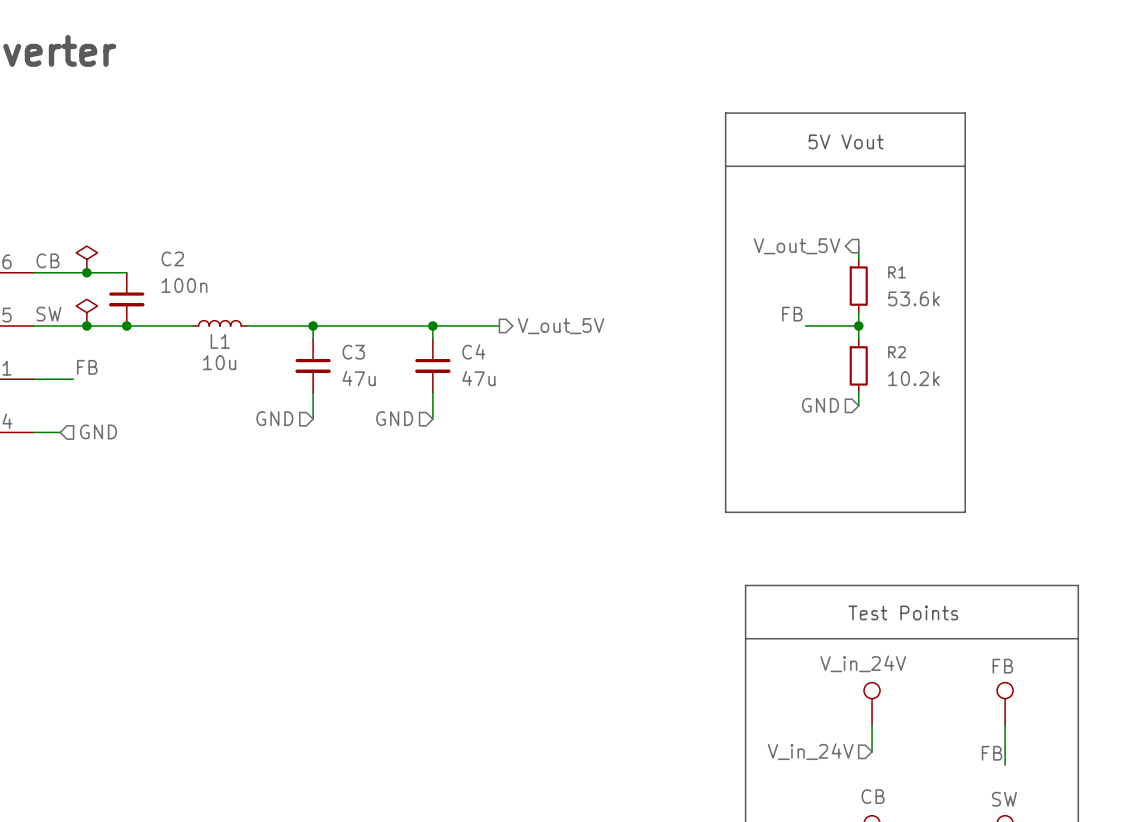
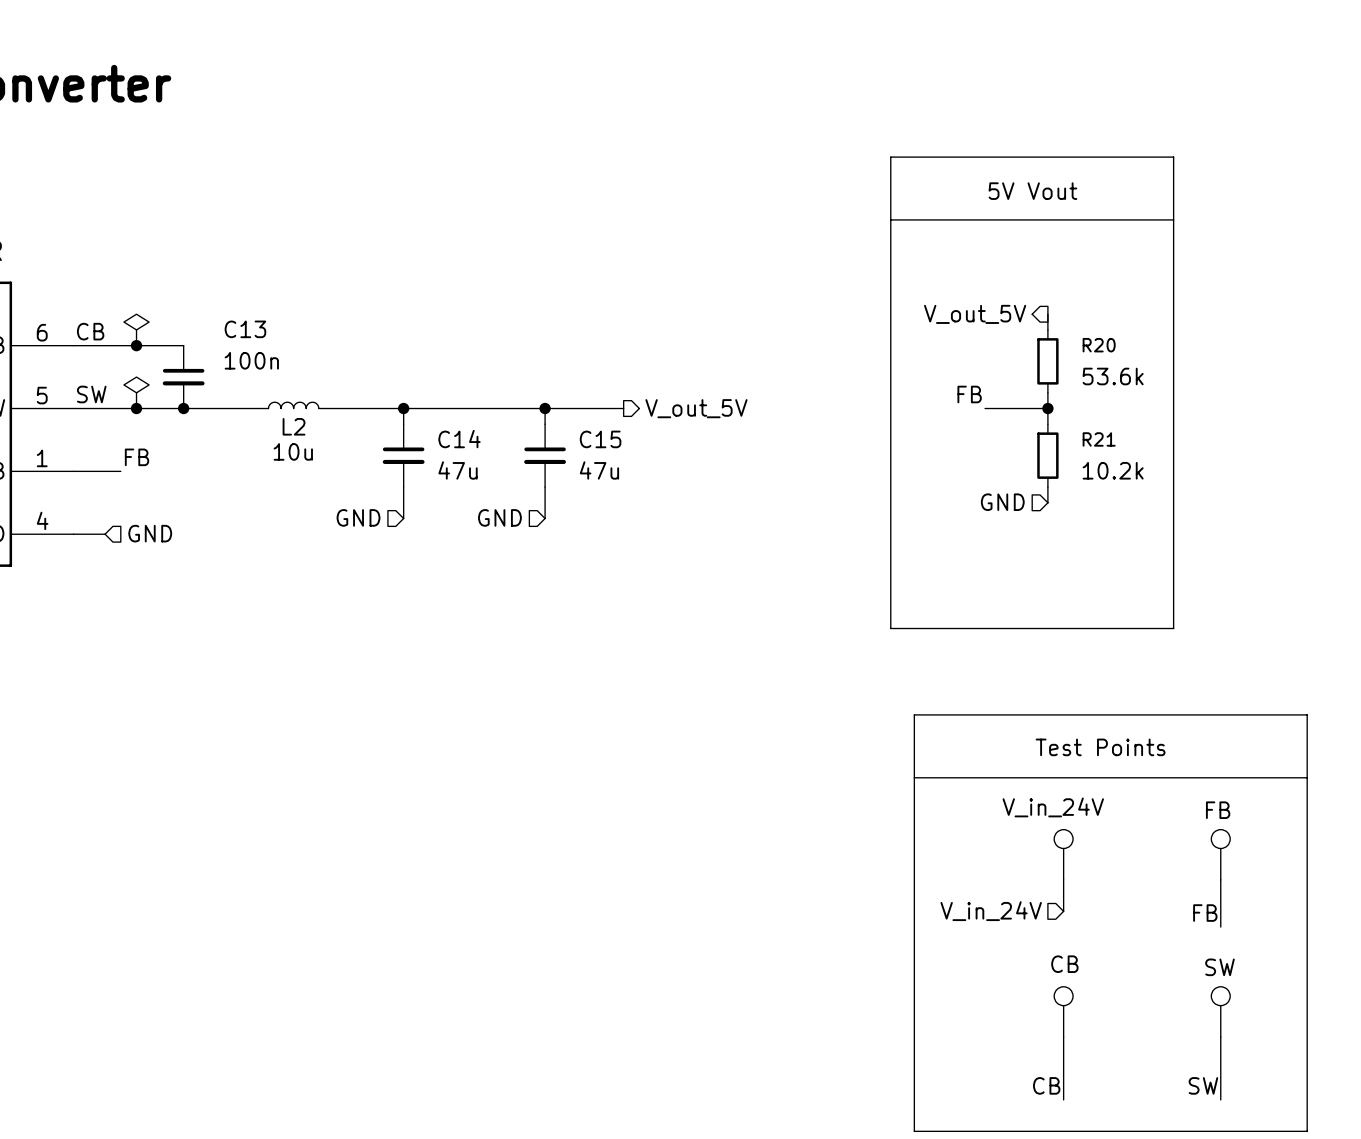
C2 name: C2 (172, 258) -> C13 (245, 329)
R1 name: R1 (897, 272) -> R20 (1099, 345)
L1 name: L1 (220, 341) -> L2 (294, 426)
C4 name: C4 (473, 351) -> C15 (600, 439)
C3 name: C3 (353, 352) -> C14 (459, 439)
R2 name: R2 (897, 352) -> R21 (1099, 439)

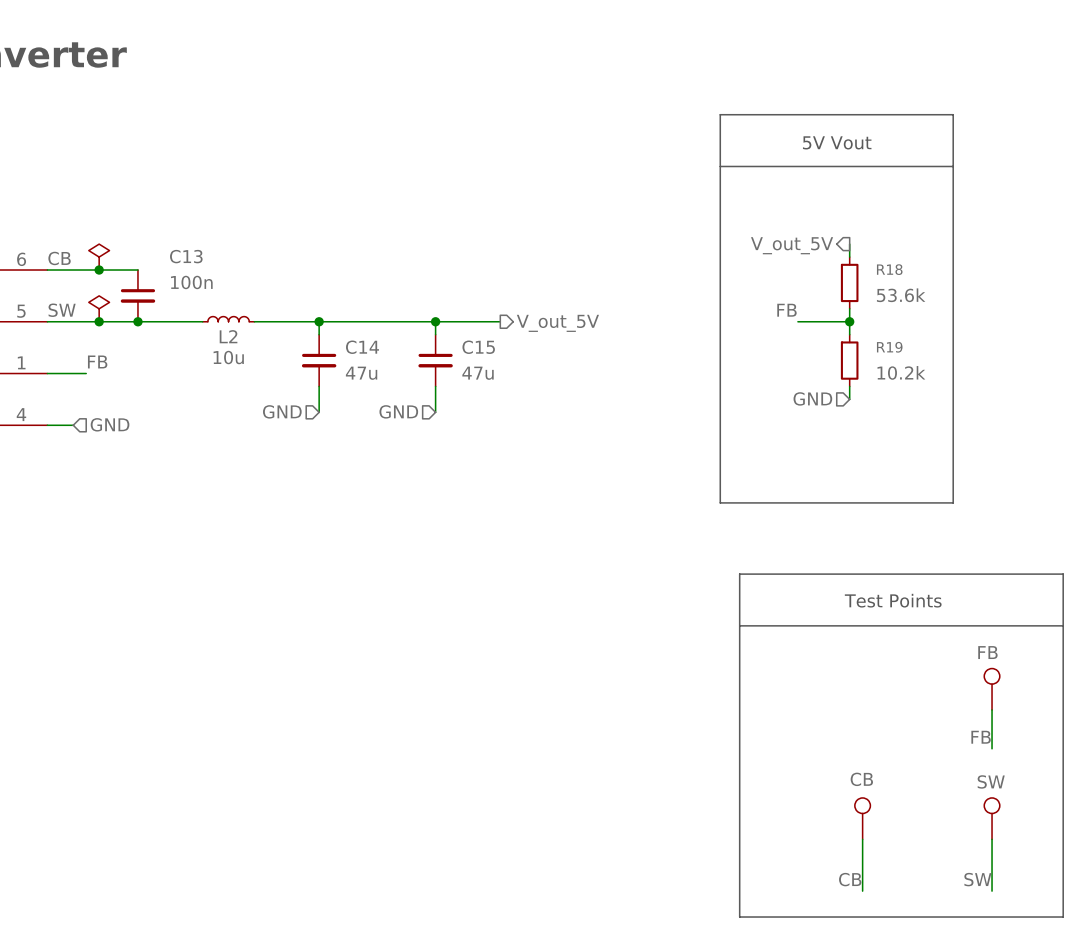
R20 name: R20 (1099, 345) -> R18 (889, 269)
R21 name: R21 (1099, 439) -> R19 (889, 347)
part: V_in_24V (1063, 854) -> none
wire: (1063, 879) (1063, 911) -> none
hierarchical label: V_in_24V (991, 911) -> none

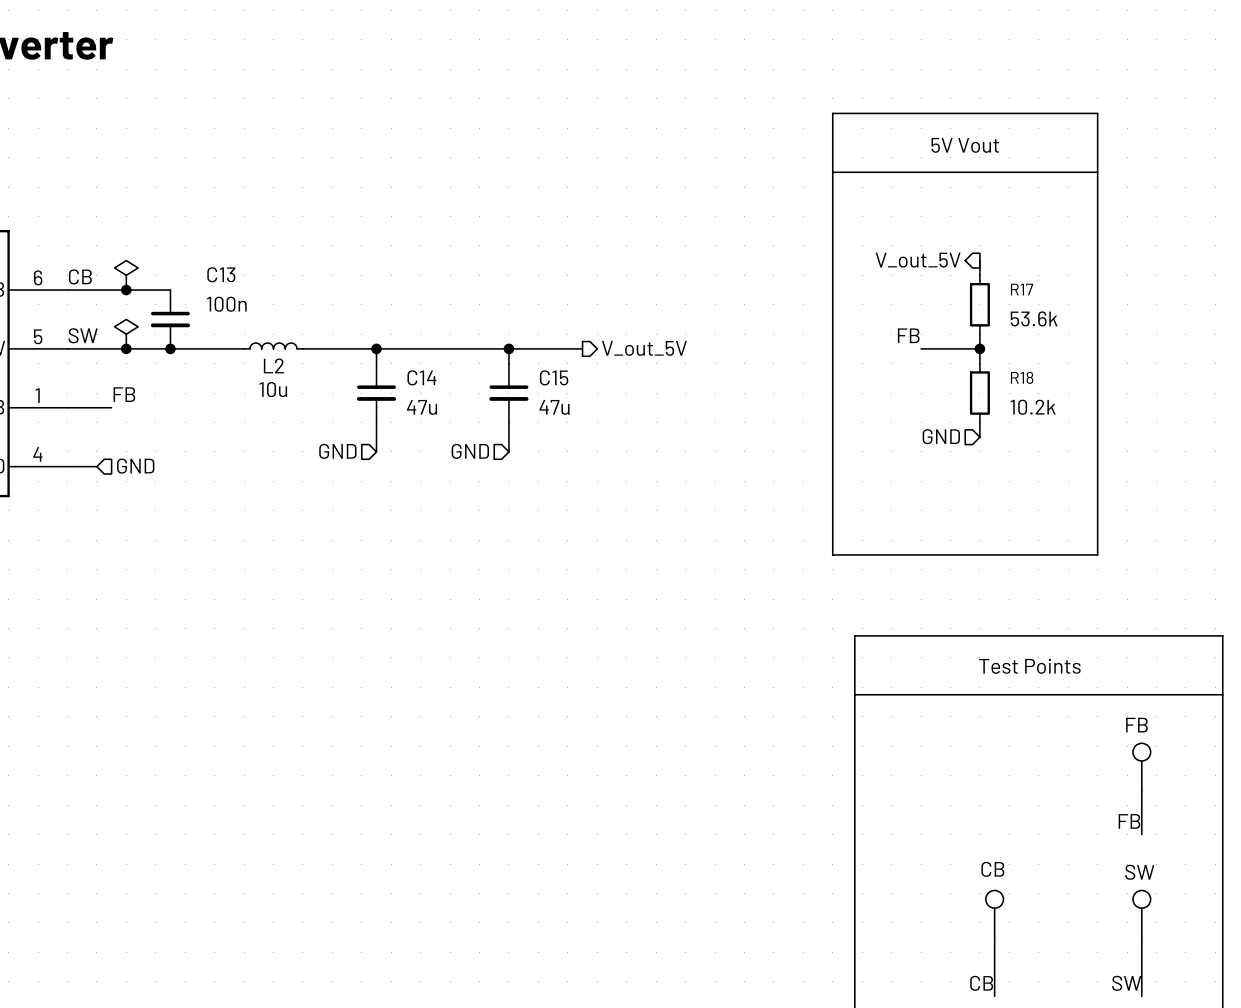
R18 name: R18 (889, 269) -> R17 (1022, 289)
R19 name: R19 (889, 347) -> R18 (1022, 377)

